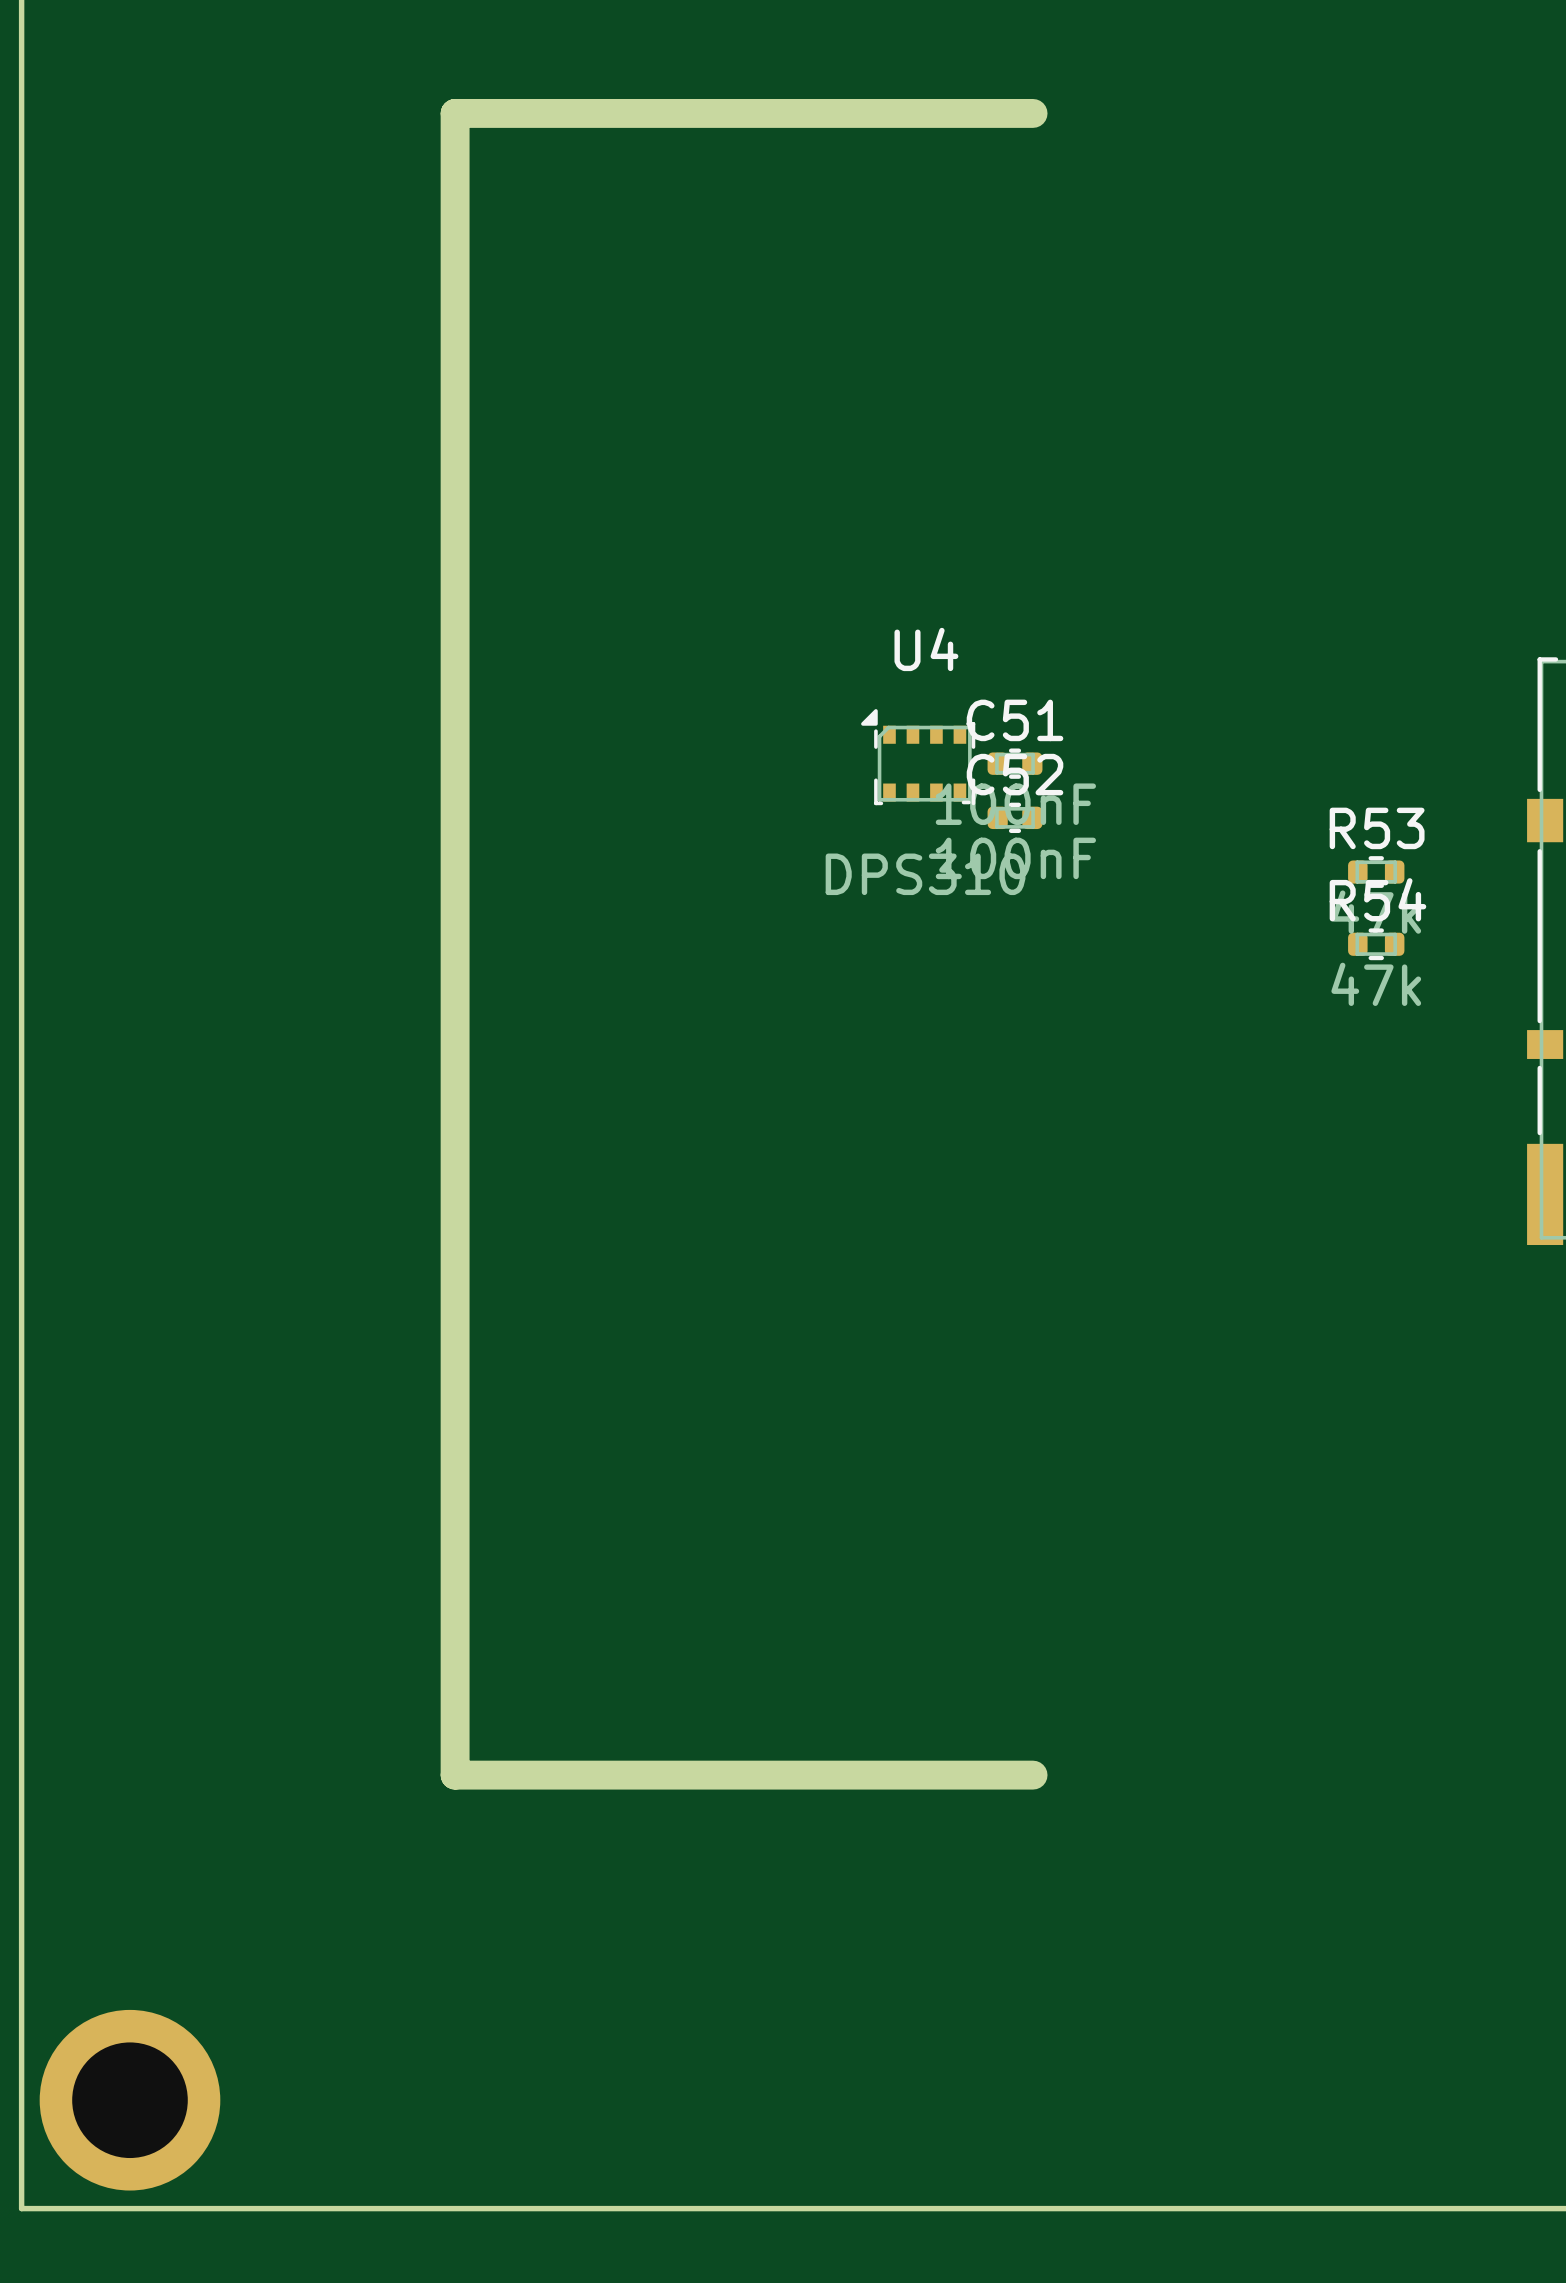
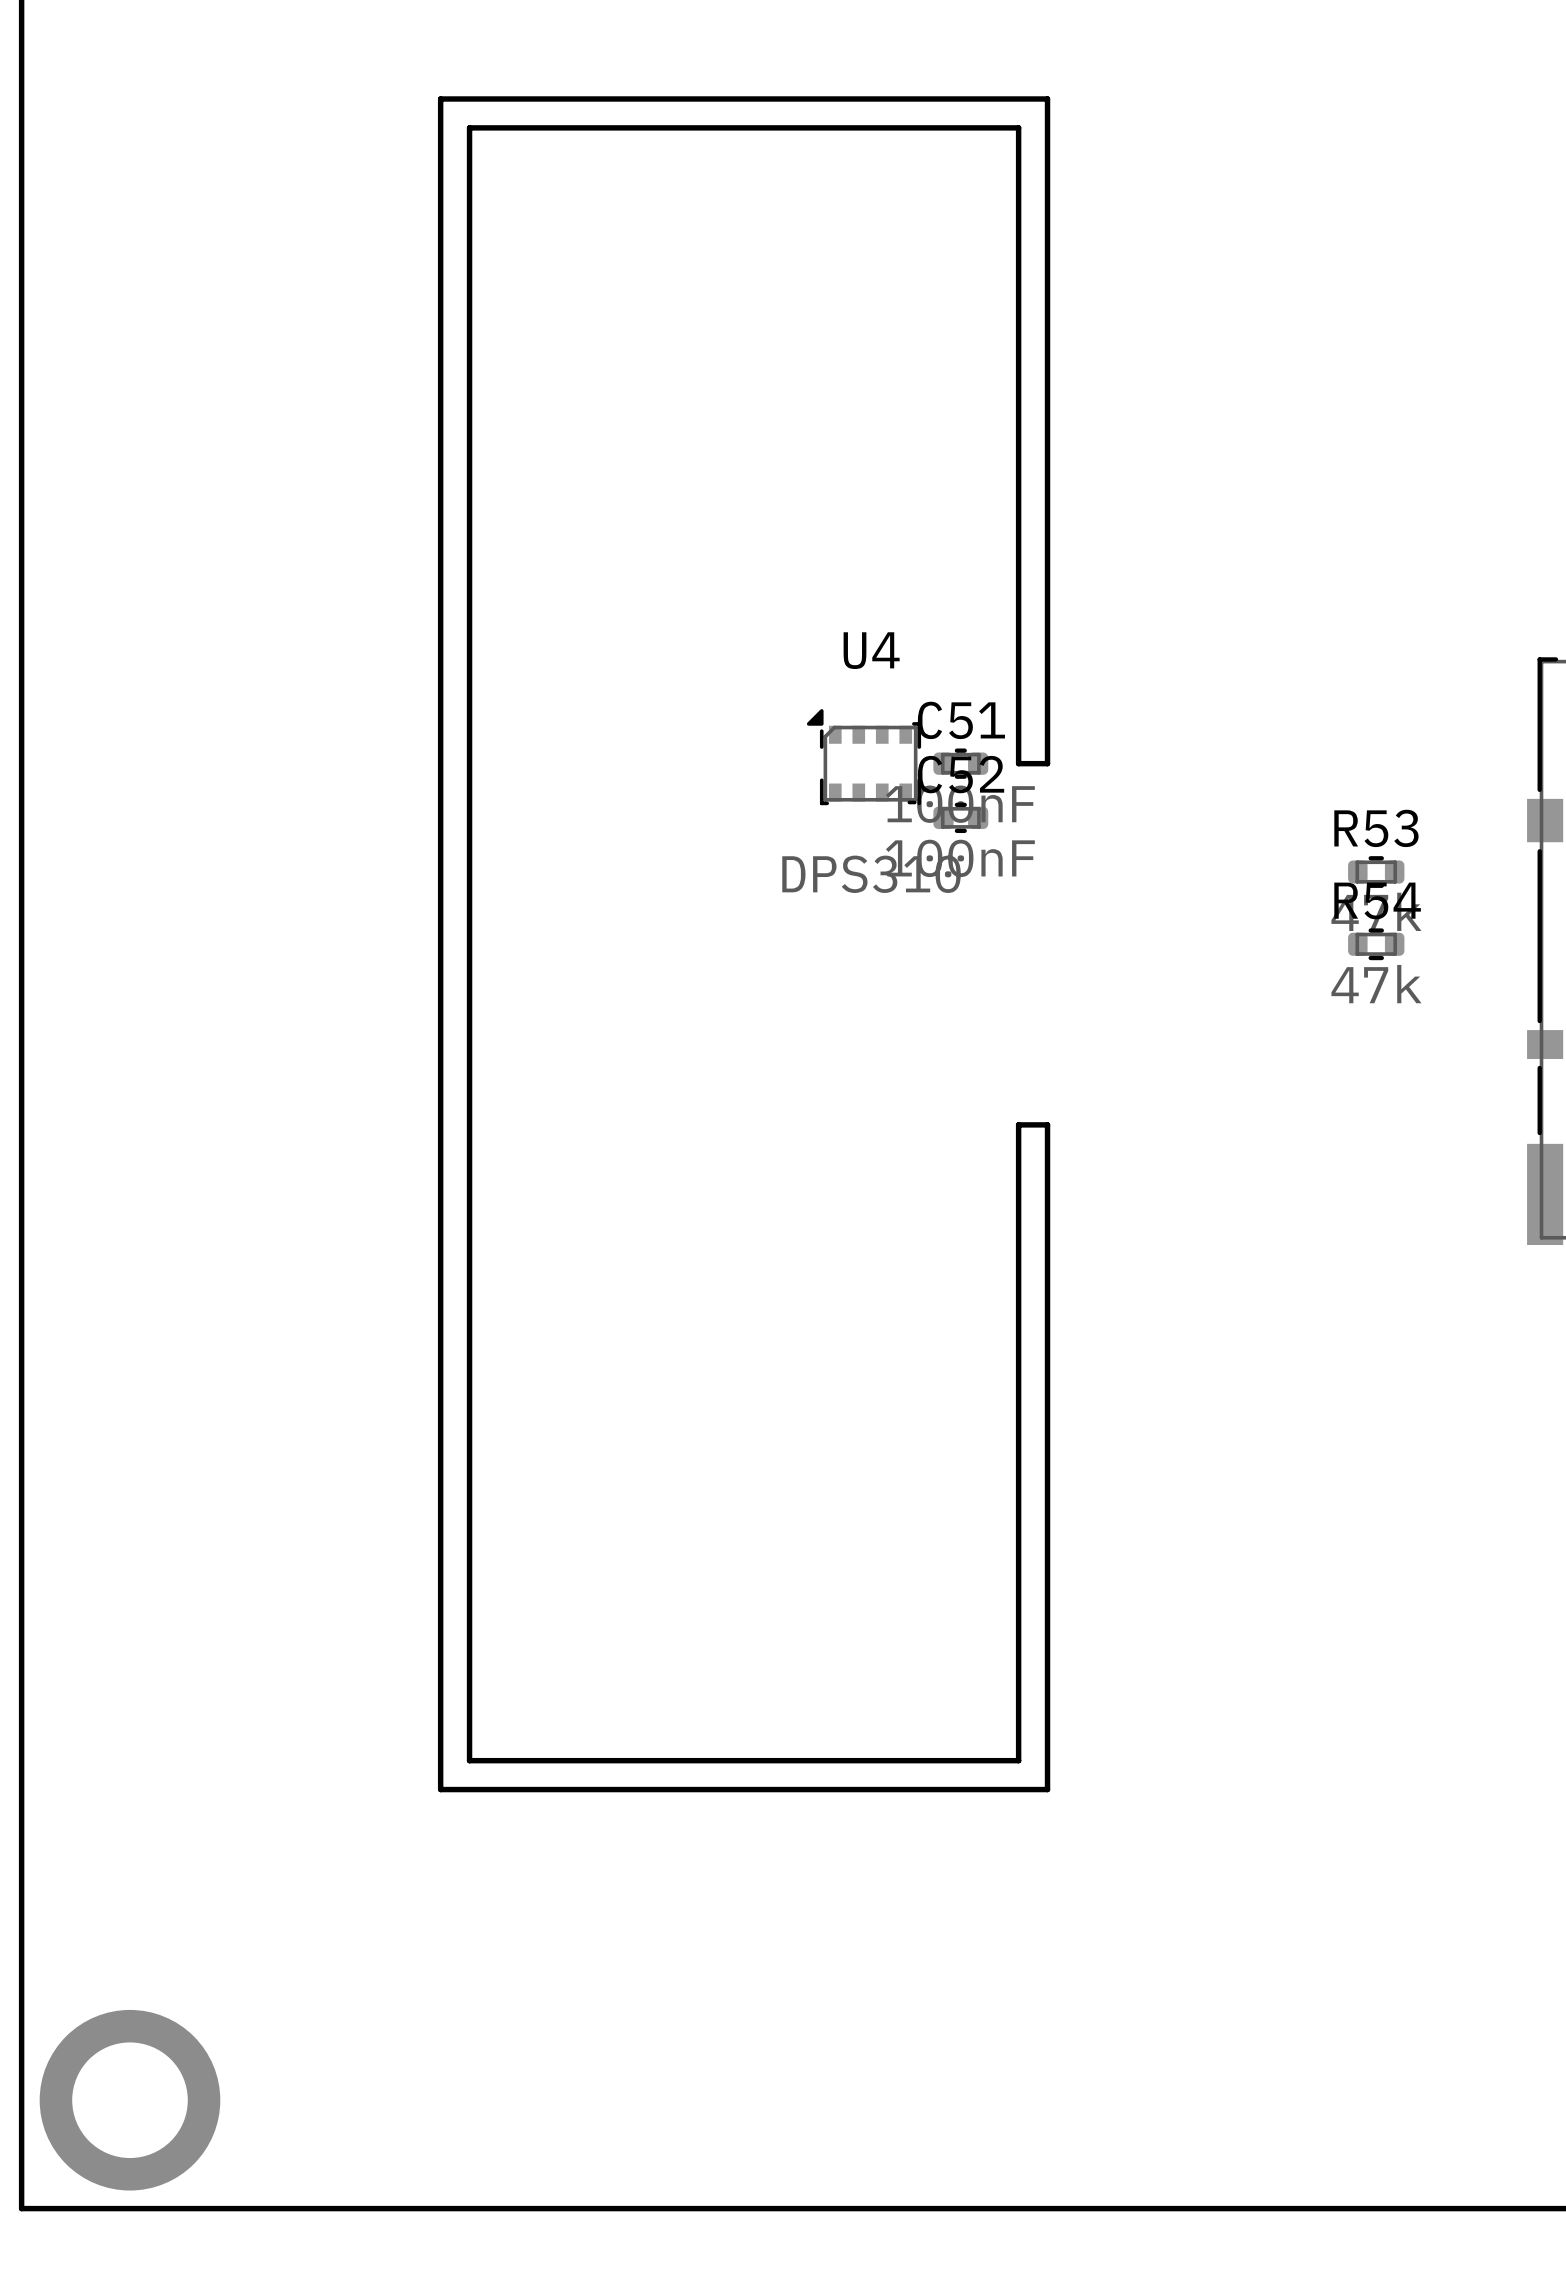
board edge: none -> (1047, 98) (440, 98) (440, 1789) (1047, 1789) (1047, 1124) (1018, 1124) (1018, 1760) (469, 1760) (469, 127) (1018, 127) (1018, 763) (1047, 763) (1047, 98)
board edge: (1033, 113) (455, 113) (455, 1775) (1033, 1775) -> none
U4 position: (918, 757) -> (864, 757)
C51 position: (1015, 763) -> (960, 763)
C52 position: (1015, 817) -> (960, 817)

